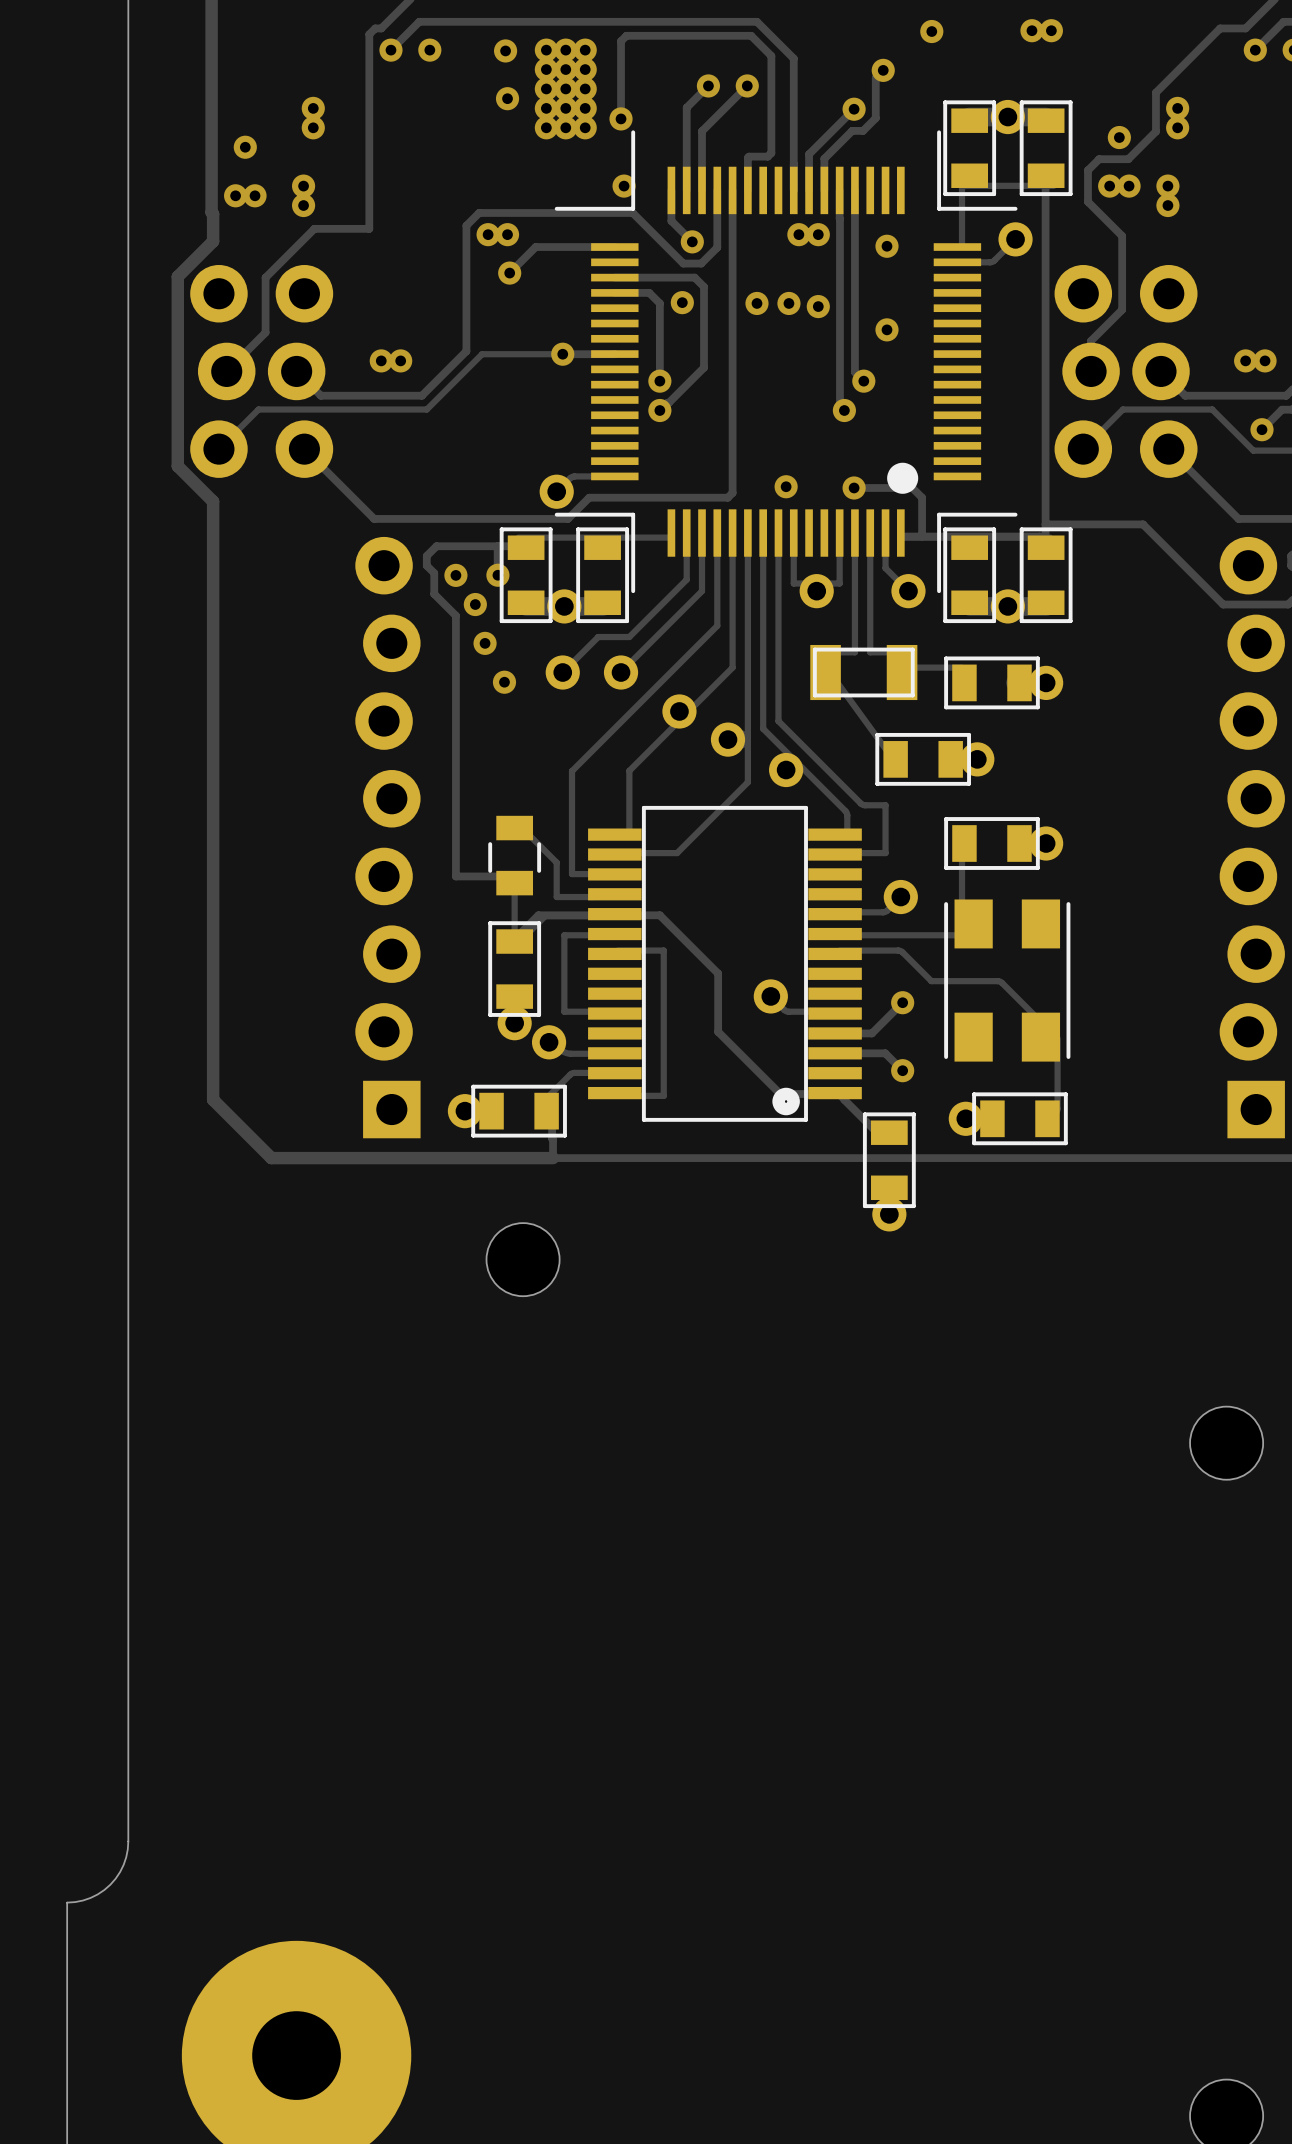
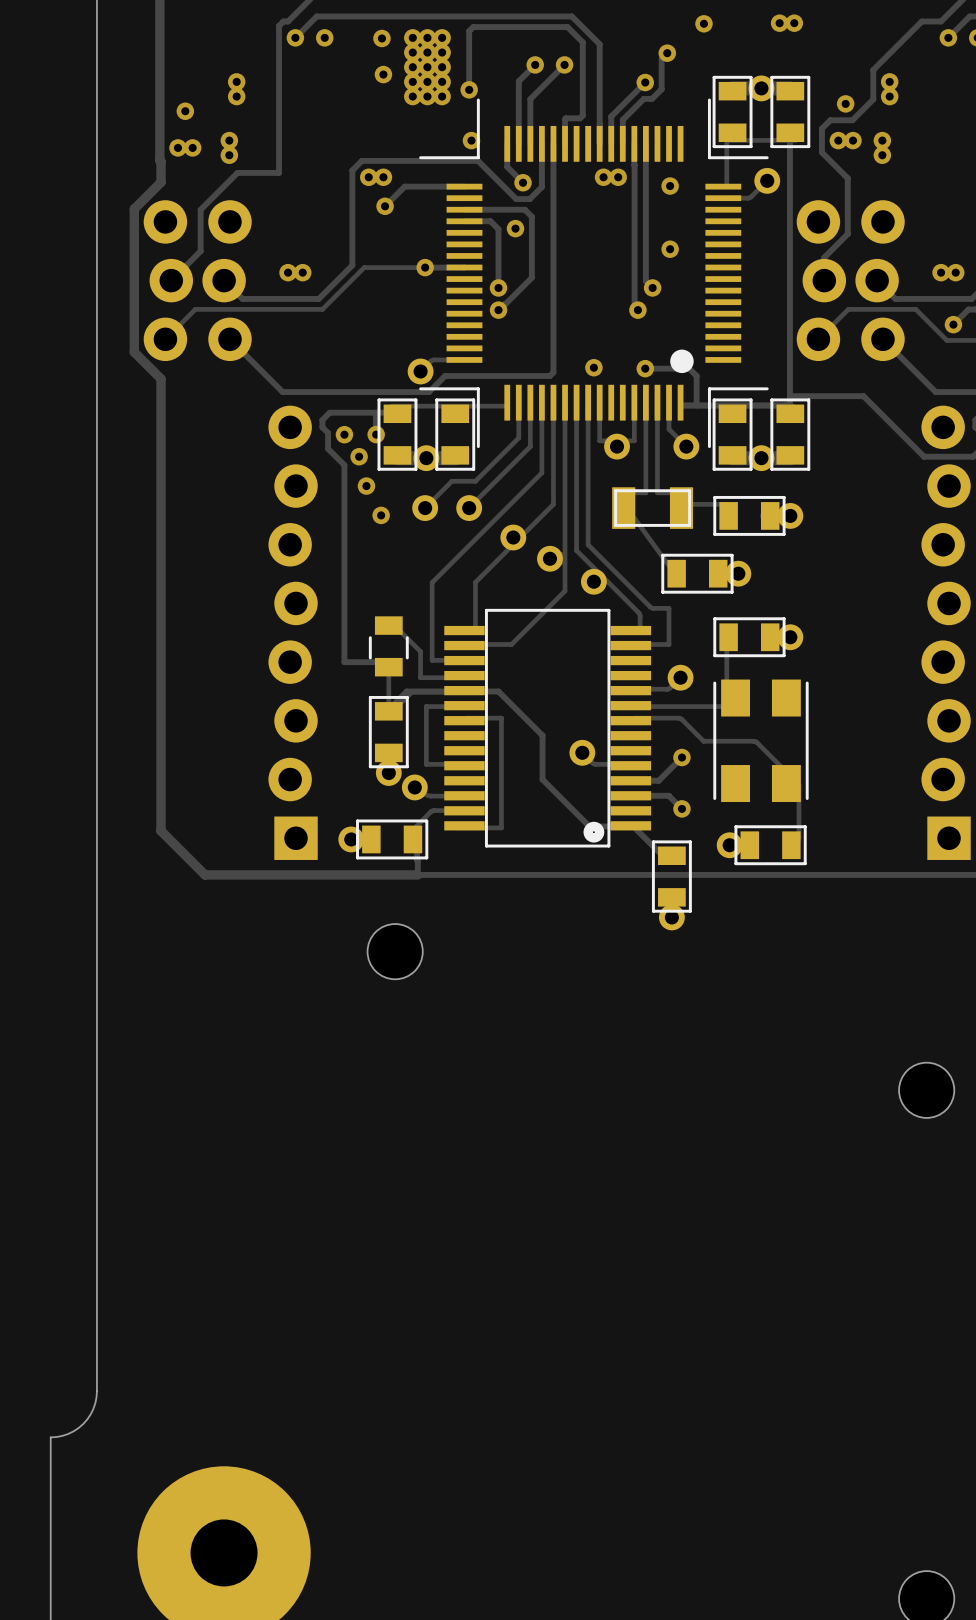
via: (756, 303) -> none
via: (788, 303) -> none
via: (818, 306) -> none

